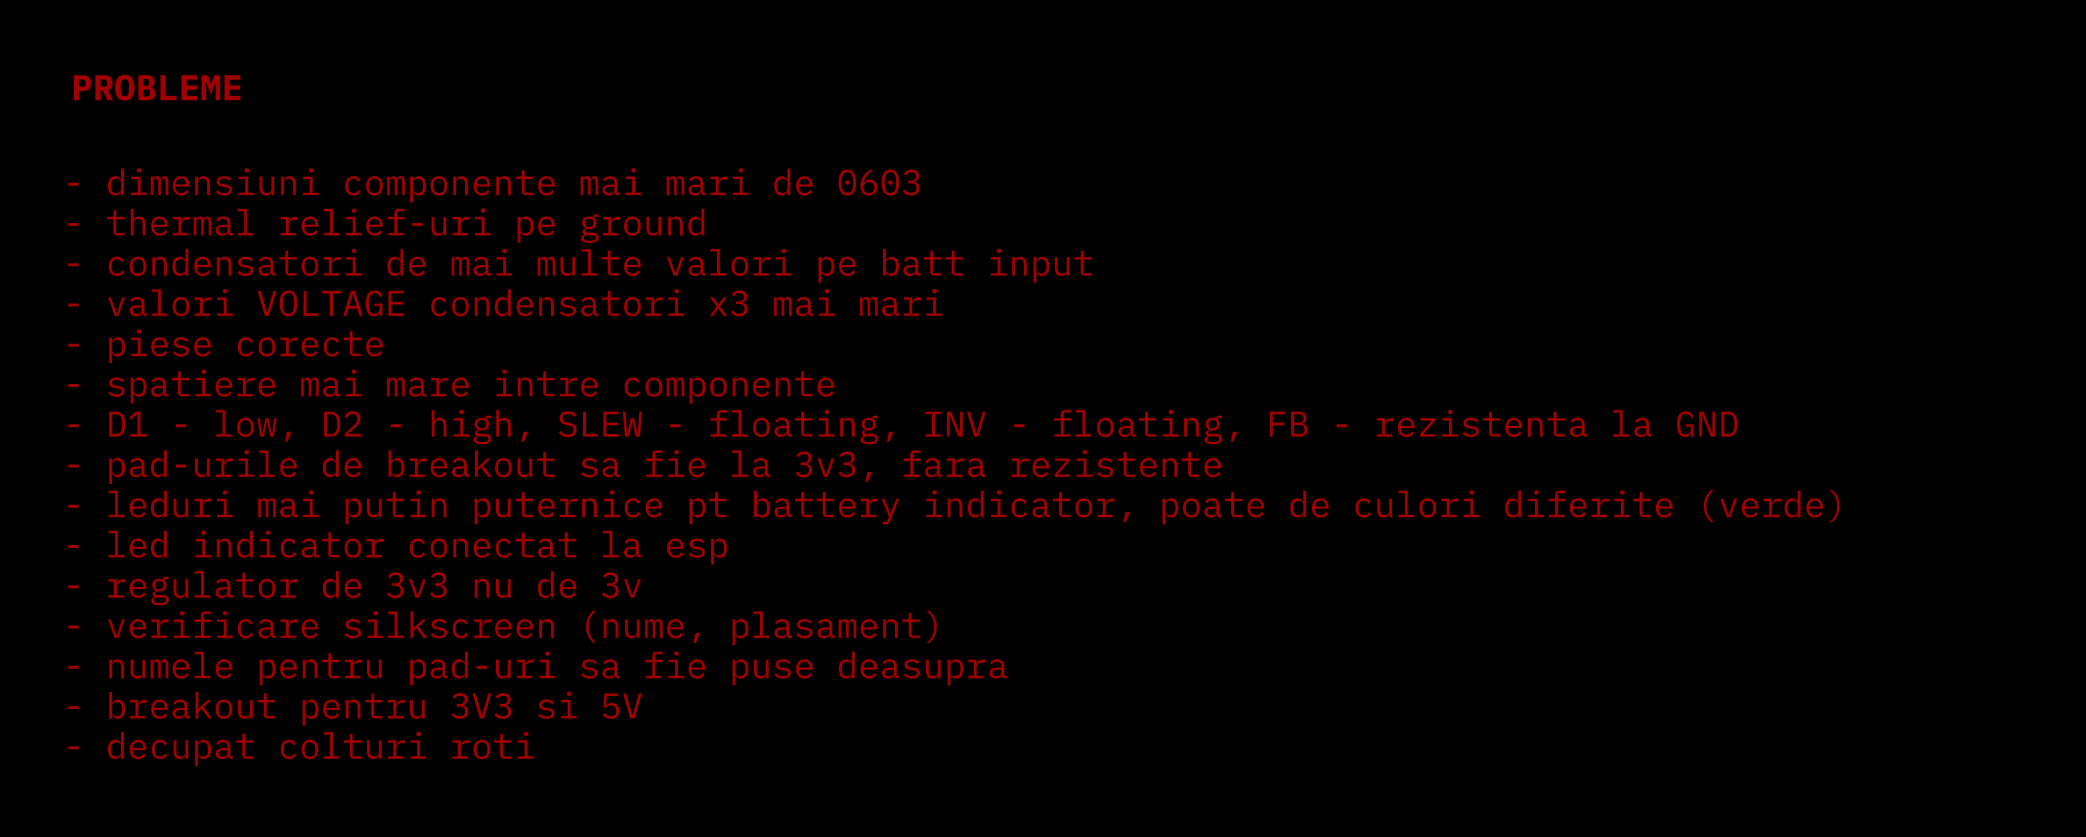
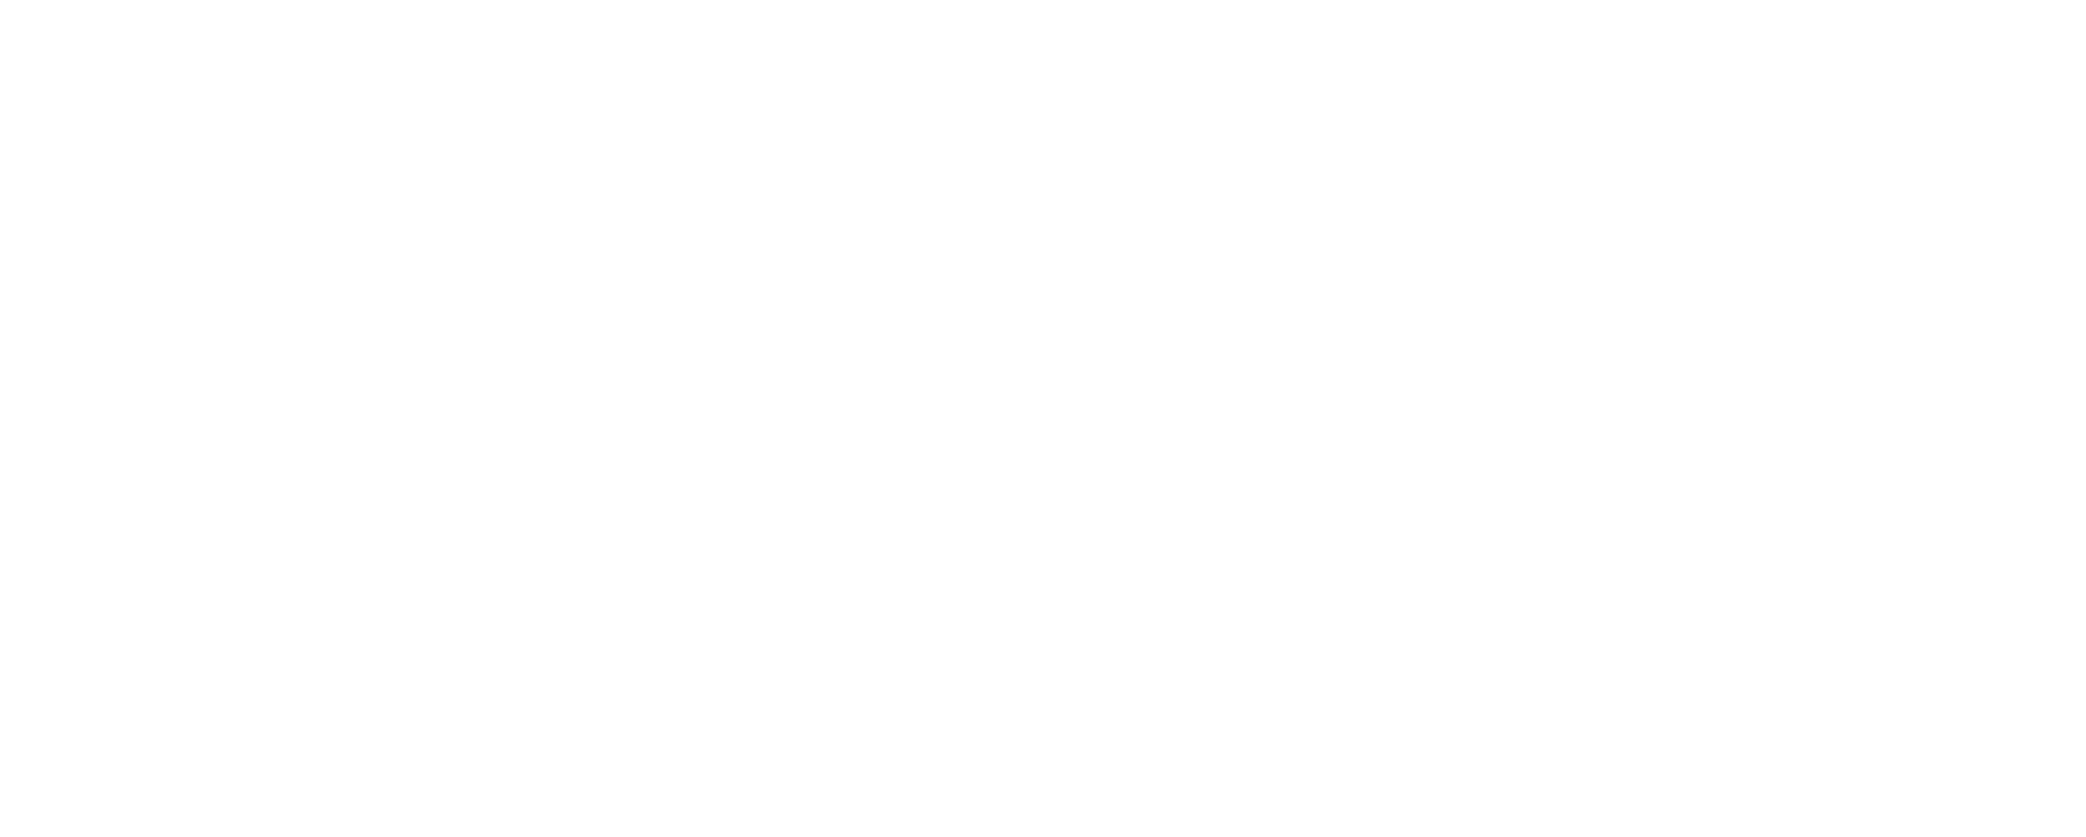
text: PROBLEME (157, 87) -> none
text: - dimensiuni componente mai mari de 0603 (494, 185) -> none
text: - thermal relief-uri pe ground (386, 225) -> none
text: - condensatori de mai multe valori pe batt input (580, 265) -> none
text: - valori VOLTAGE condensatori x3 mai mari (505, 302) -> none
text: - piese corecte (225, 346) -> none
text: - spatiere mai mare intre componente (451, 386) -> none
text: - D1 - low, D2 - high, SLEW - floating, INV - floating, FB - rezistenta la GND (902, 427) -> none
text: - pad-urile de breakout sa fie la 3v3, fara rezistente (644, 467) -> none
text: - leduri mai putin puternice pt battery indicator, poate de culori diferite (verde) (953, 507) -> none
text: - led indicator conectat la esp (397, 547) -> none
text: - regulator de 3v3 nu de 3v (354, 588) -> none
text: - verificare silkscreen (nume, plasament) (502, 627) -> none
text: - numele pentru pad-uri sa fie puse deasupra (537, 668) -> none
text: - breakout pentru 3V3 si 5V (355, 708) -> none
text: - decupat colturi roti (301, 748) -> none

